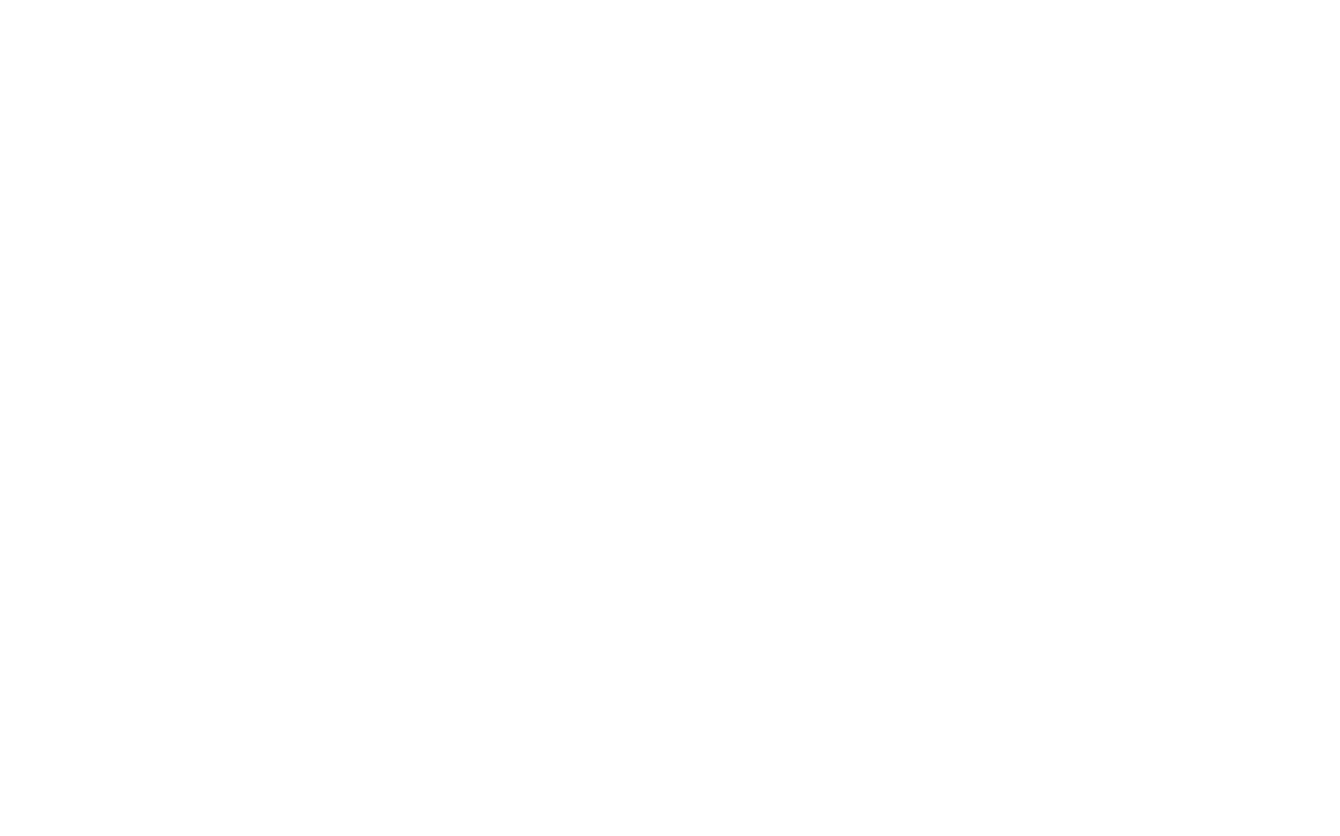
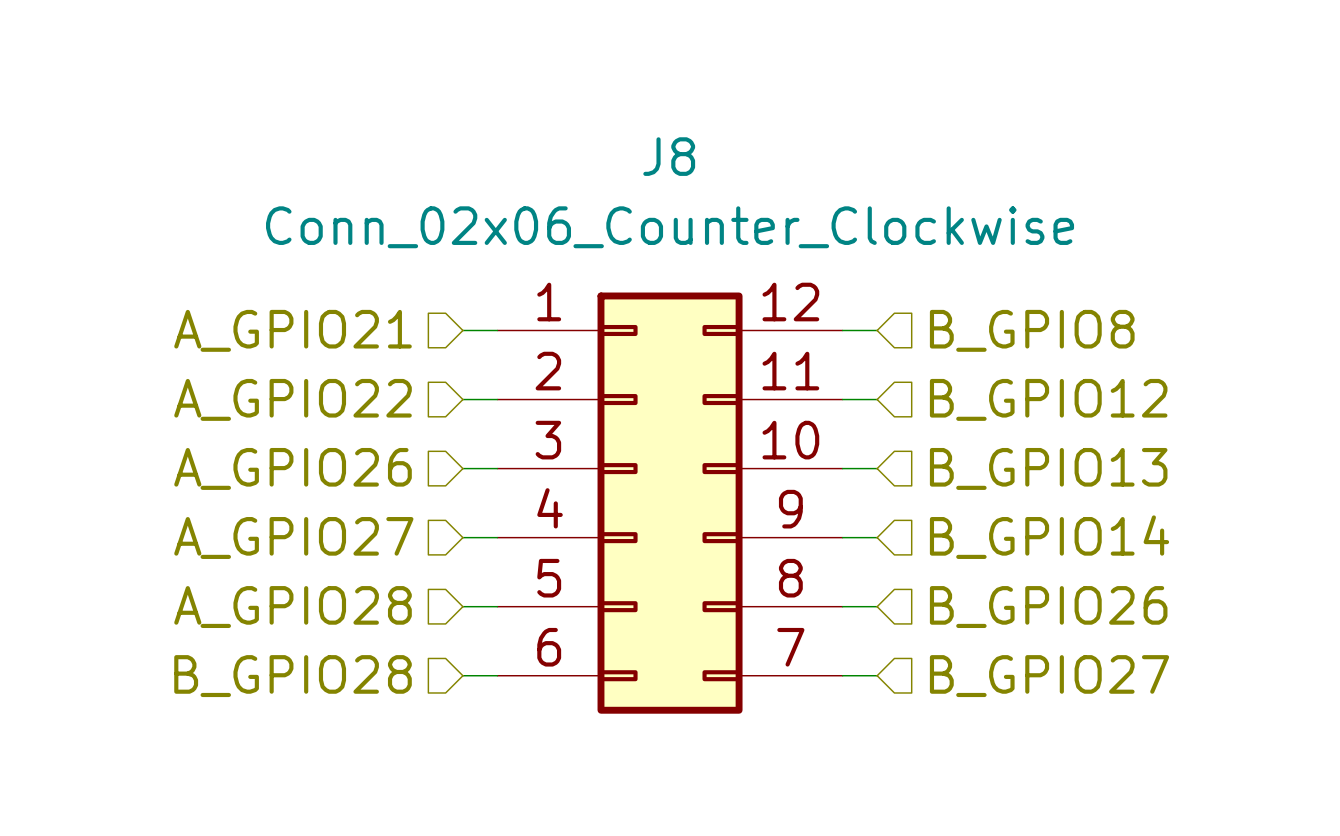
hierarchical label: none -> A_GPIO21 (293, 330)
wire: none -> (462, 330) (497, 330)
wire: none -> (842, 330) (877, 330)
hierarchical label: none -> B_GPIO8 (1032, 330)
hierarchical label: none -> A_GPIO22 (293, 399)
wire: none -> (462, 399) (497, 399)
wire: none -> (842, 399) (877, 399)
hierarchical label: none -> B_GPIO12 (1048, 399)
hierarchical label: none -> A_GPIO26 (293, 468)
wire: none -> (462, 468) (497, 468)
wire: none -> (842, 468) (877, 468)
hierarchical label: none -> B_GPIO13 (1048, 468)
J8: none -> Conn_02x06_Counter_Clockwise (670, 503)
hierarchical label: none -> A_GPIO27 (293, 537)
wire: none -> (462, 537) (497, 537)
wire: none -> (842, 537) (877, 537)
hierarchical label: none -> B_GPIO14 (1049, 537)
wire: none -> (462, 606) (497, 606)
wire: none -> (842, 606) (877, 606)
hierarchical label: none -> A_GPIO28 (293, 607)
hierarchical label: none -> B_GPIO26 (1048, 607)
wire: none -> (462, 675) (497, 675)
wire: none -> (842, 675) (877, 675)
hierarchical label: none -> B_GPIO28 (293, 676)
hierarchical label: none -> B_GPIO27 (1049, 676)

